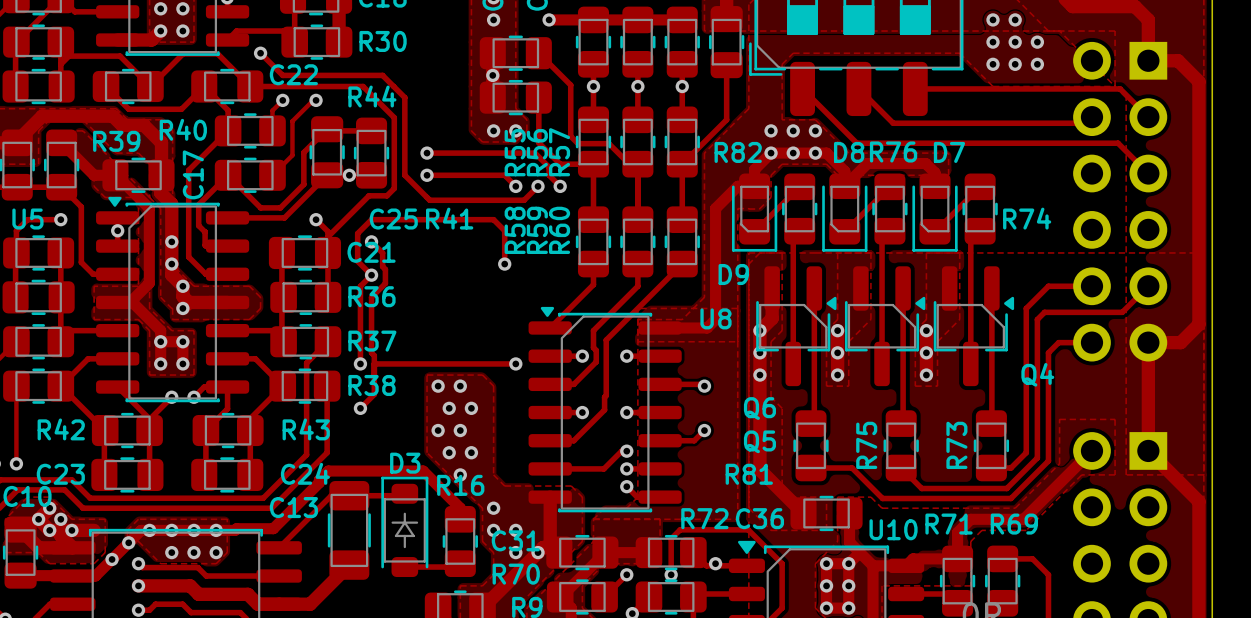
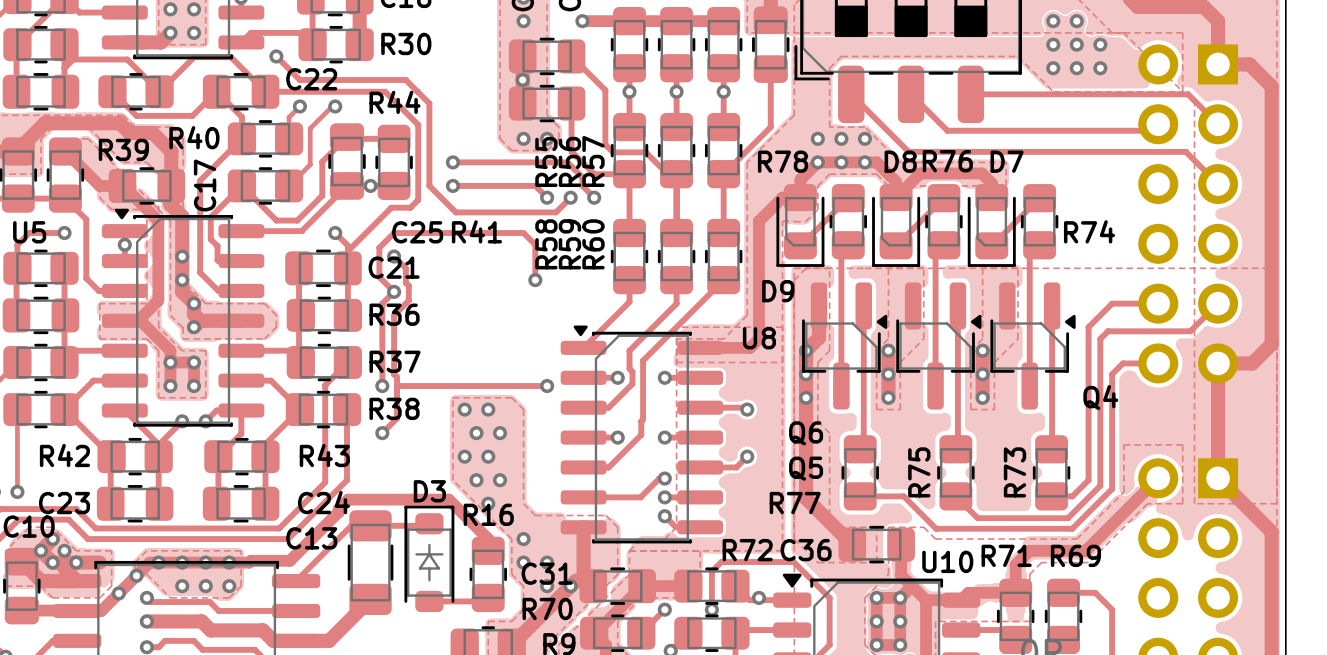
R82 name: R82 (738, 152) -> R78 (782, 161)
R81 name: R81 (749, 474) -> R77 (795, 503)

